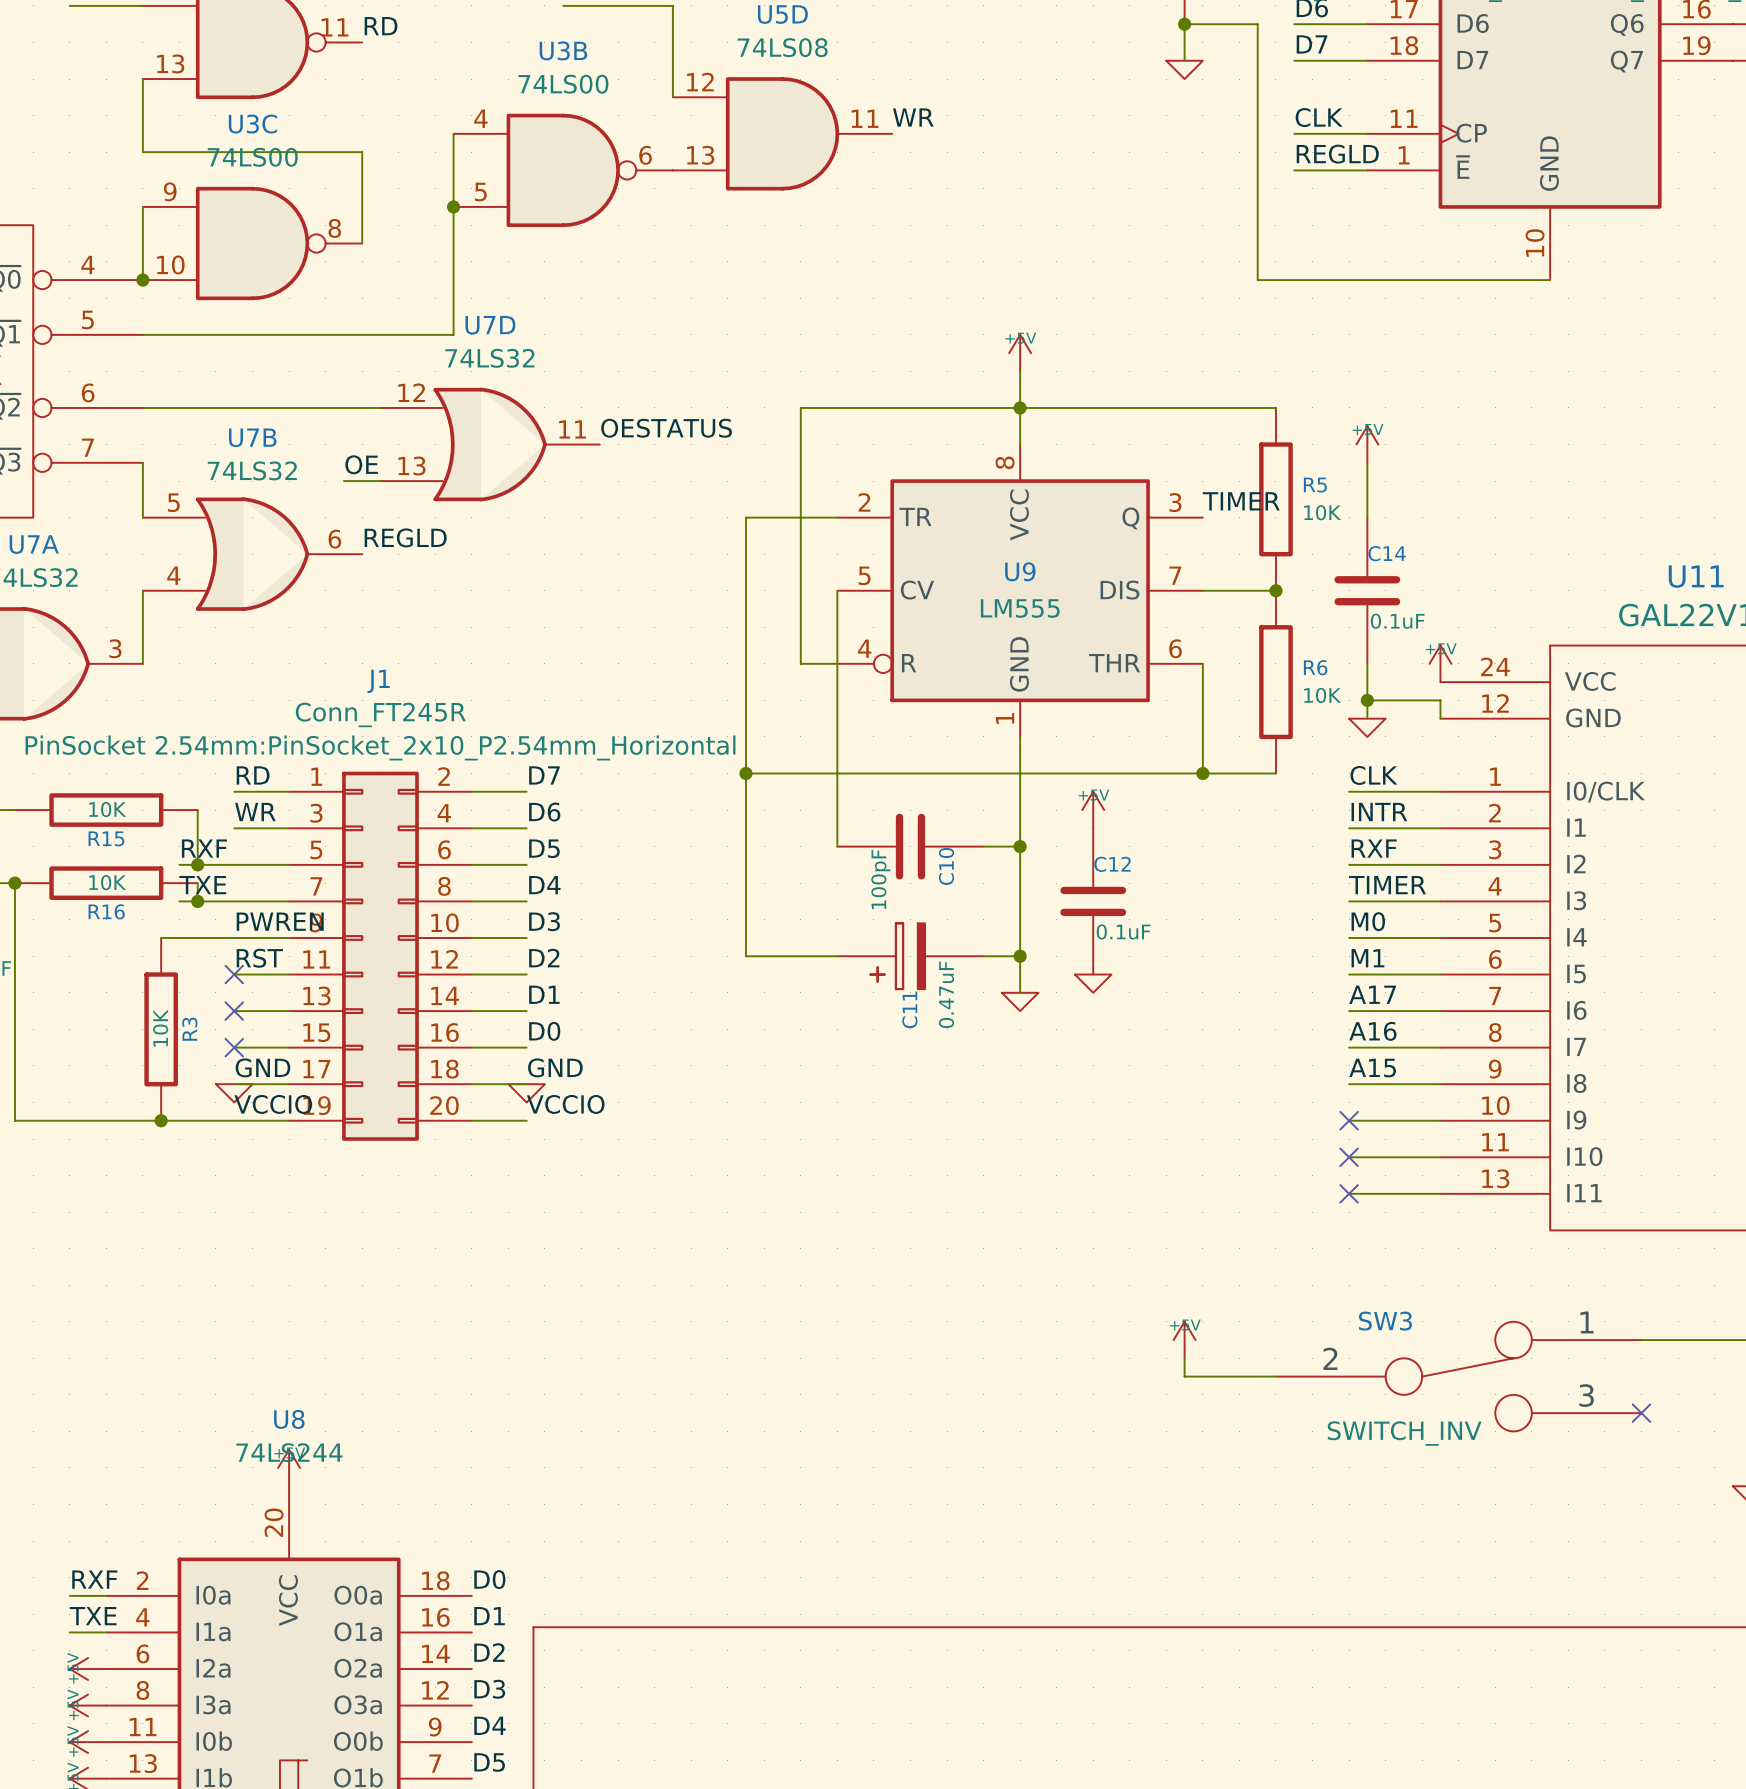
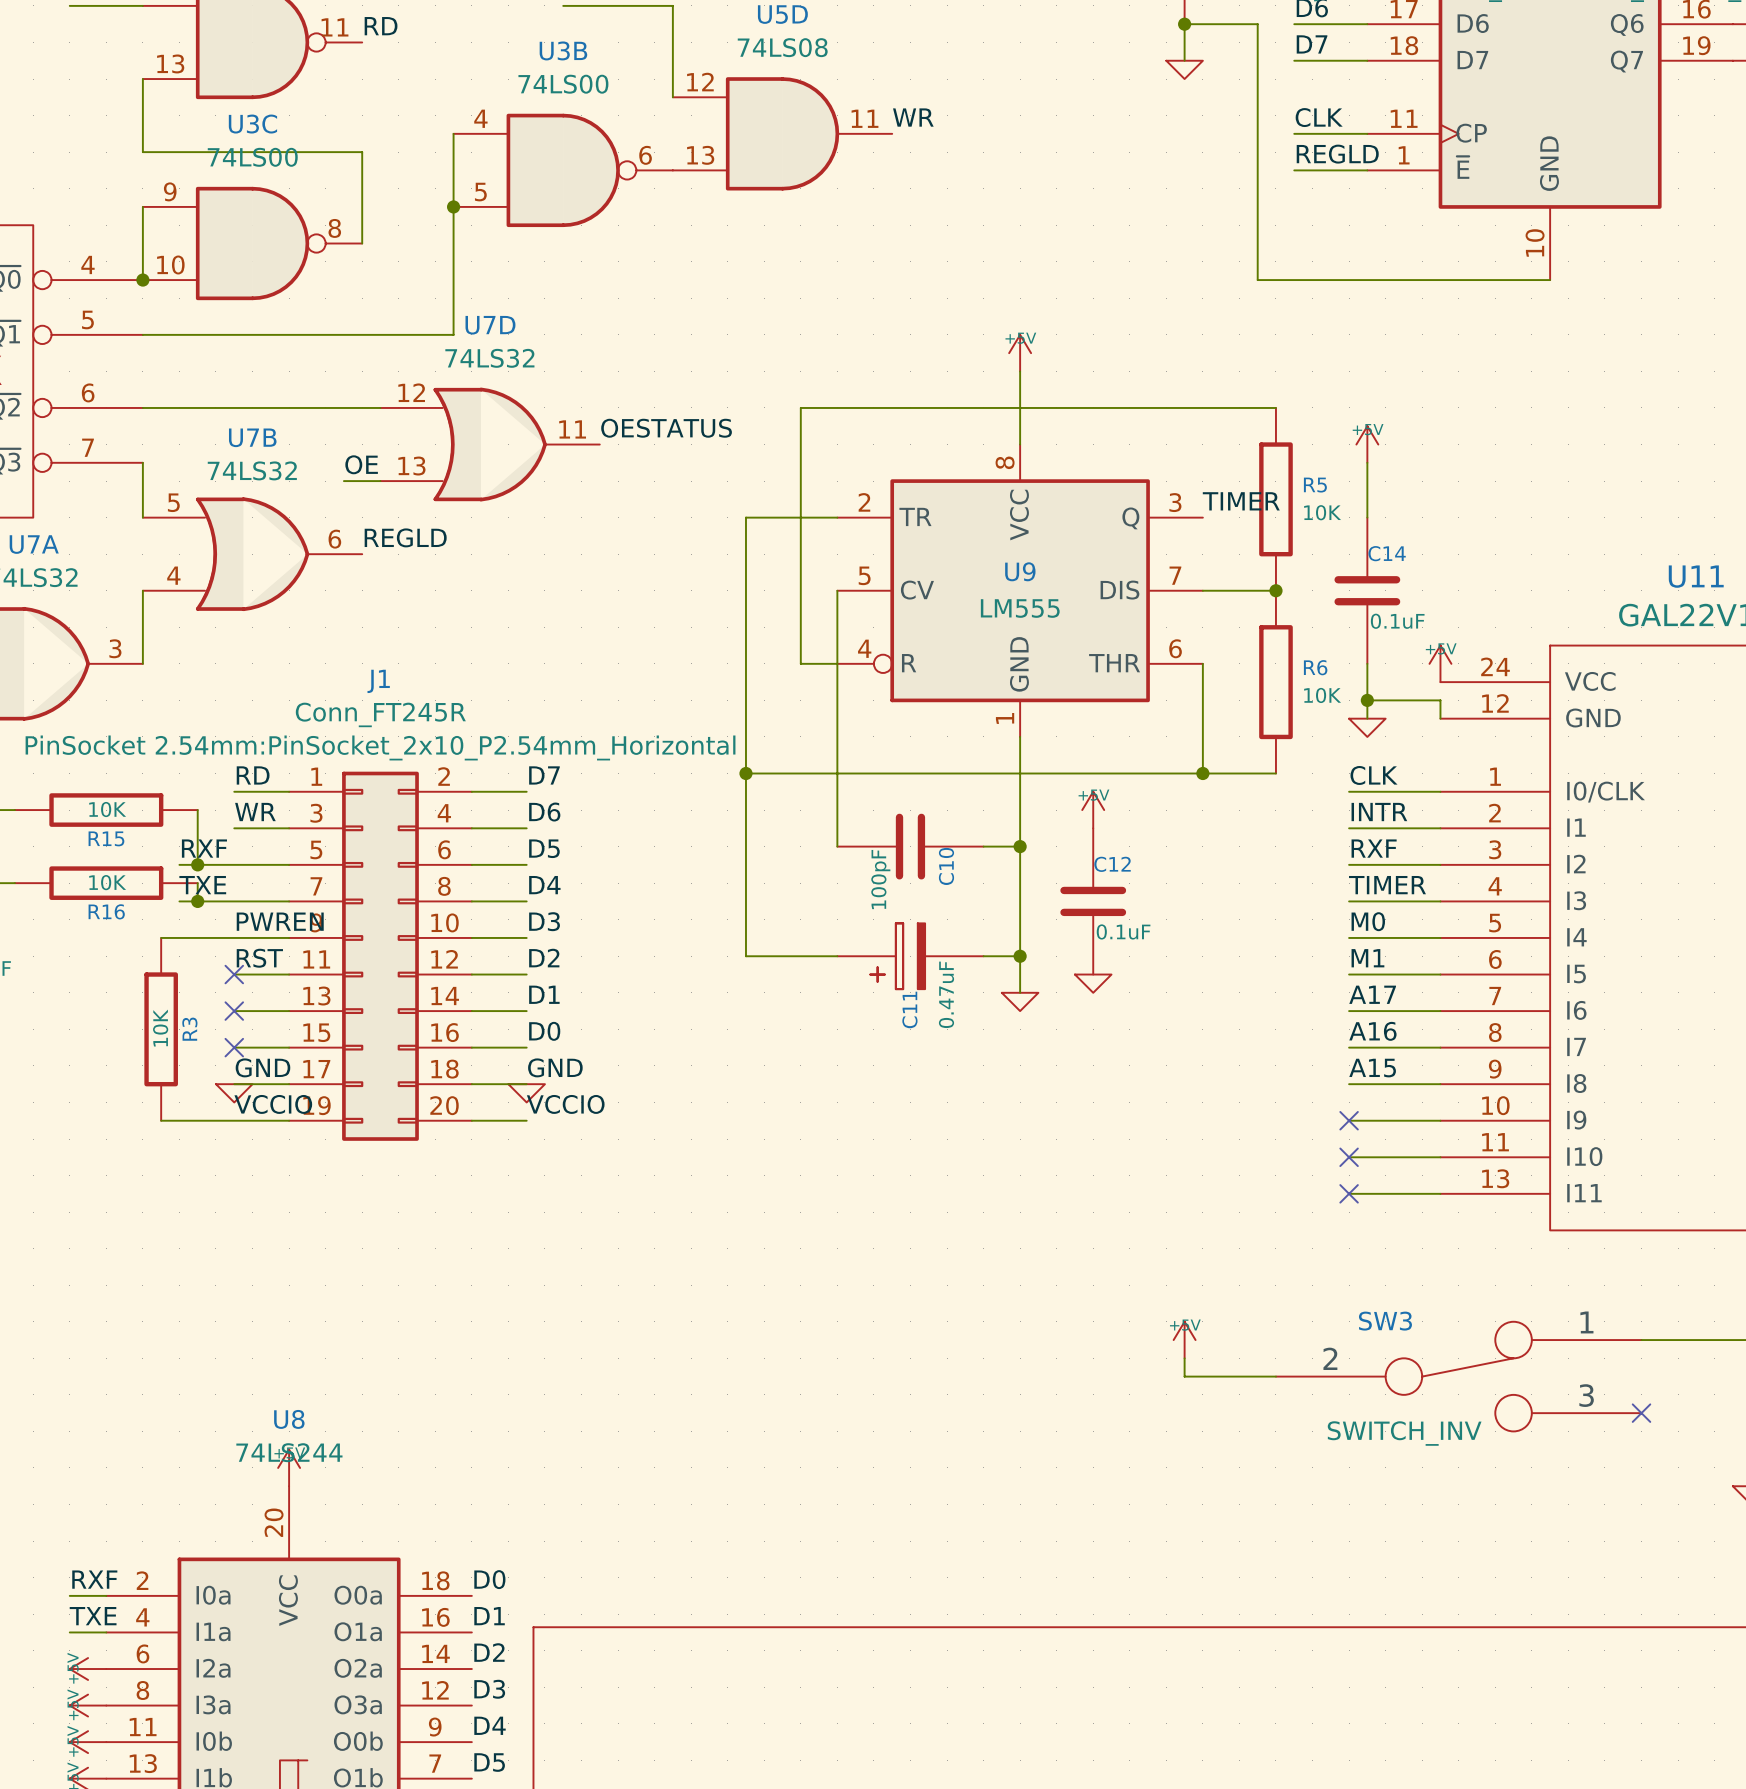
junction: (1020, 407) -> none
wire: (14, 883) (14, 1120) (161, 1120) -> none
junction: (14, 883) -> none
junction: (161, 1120) -> none

